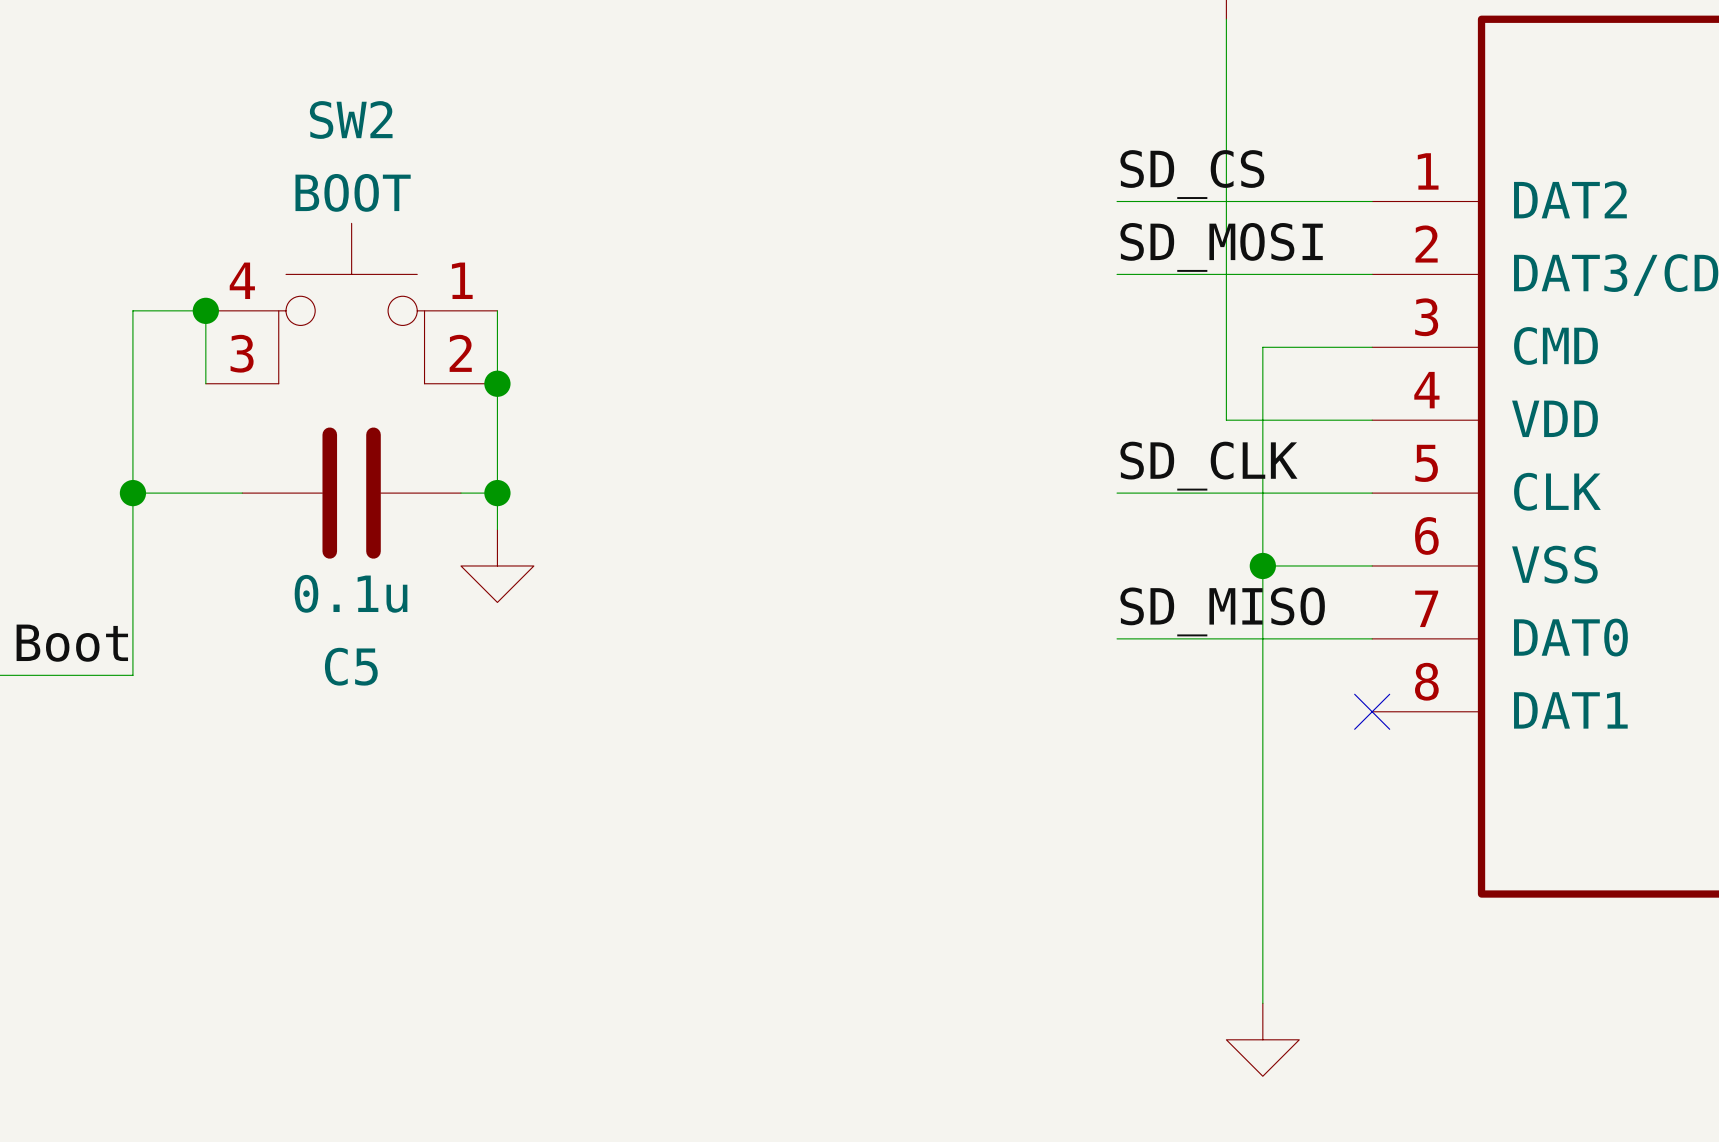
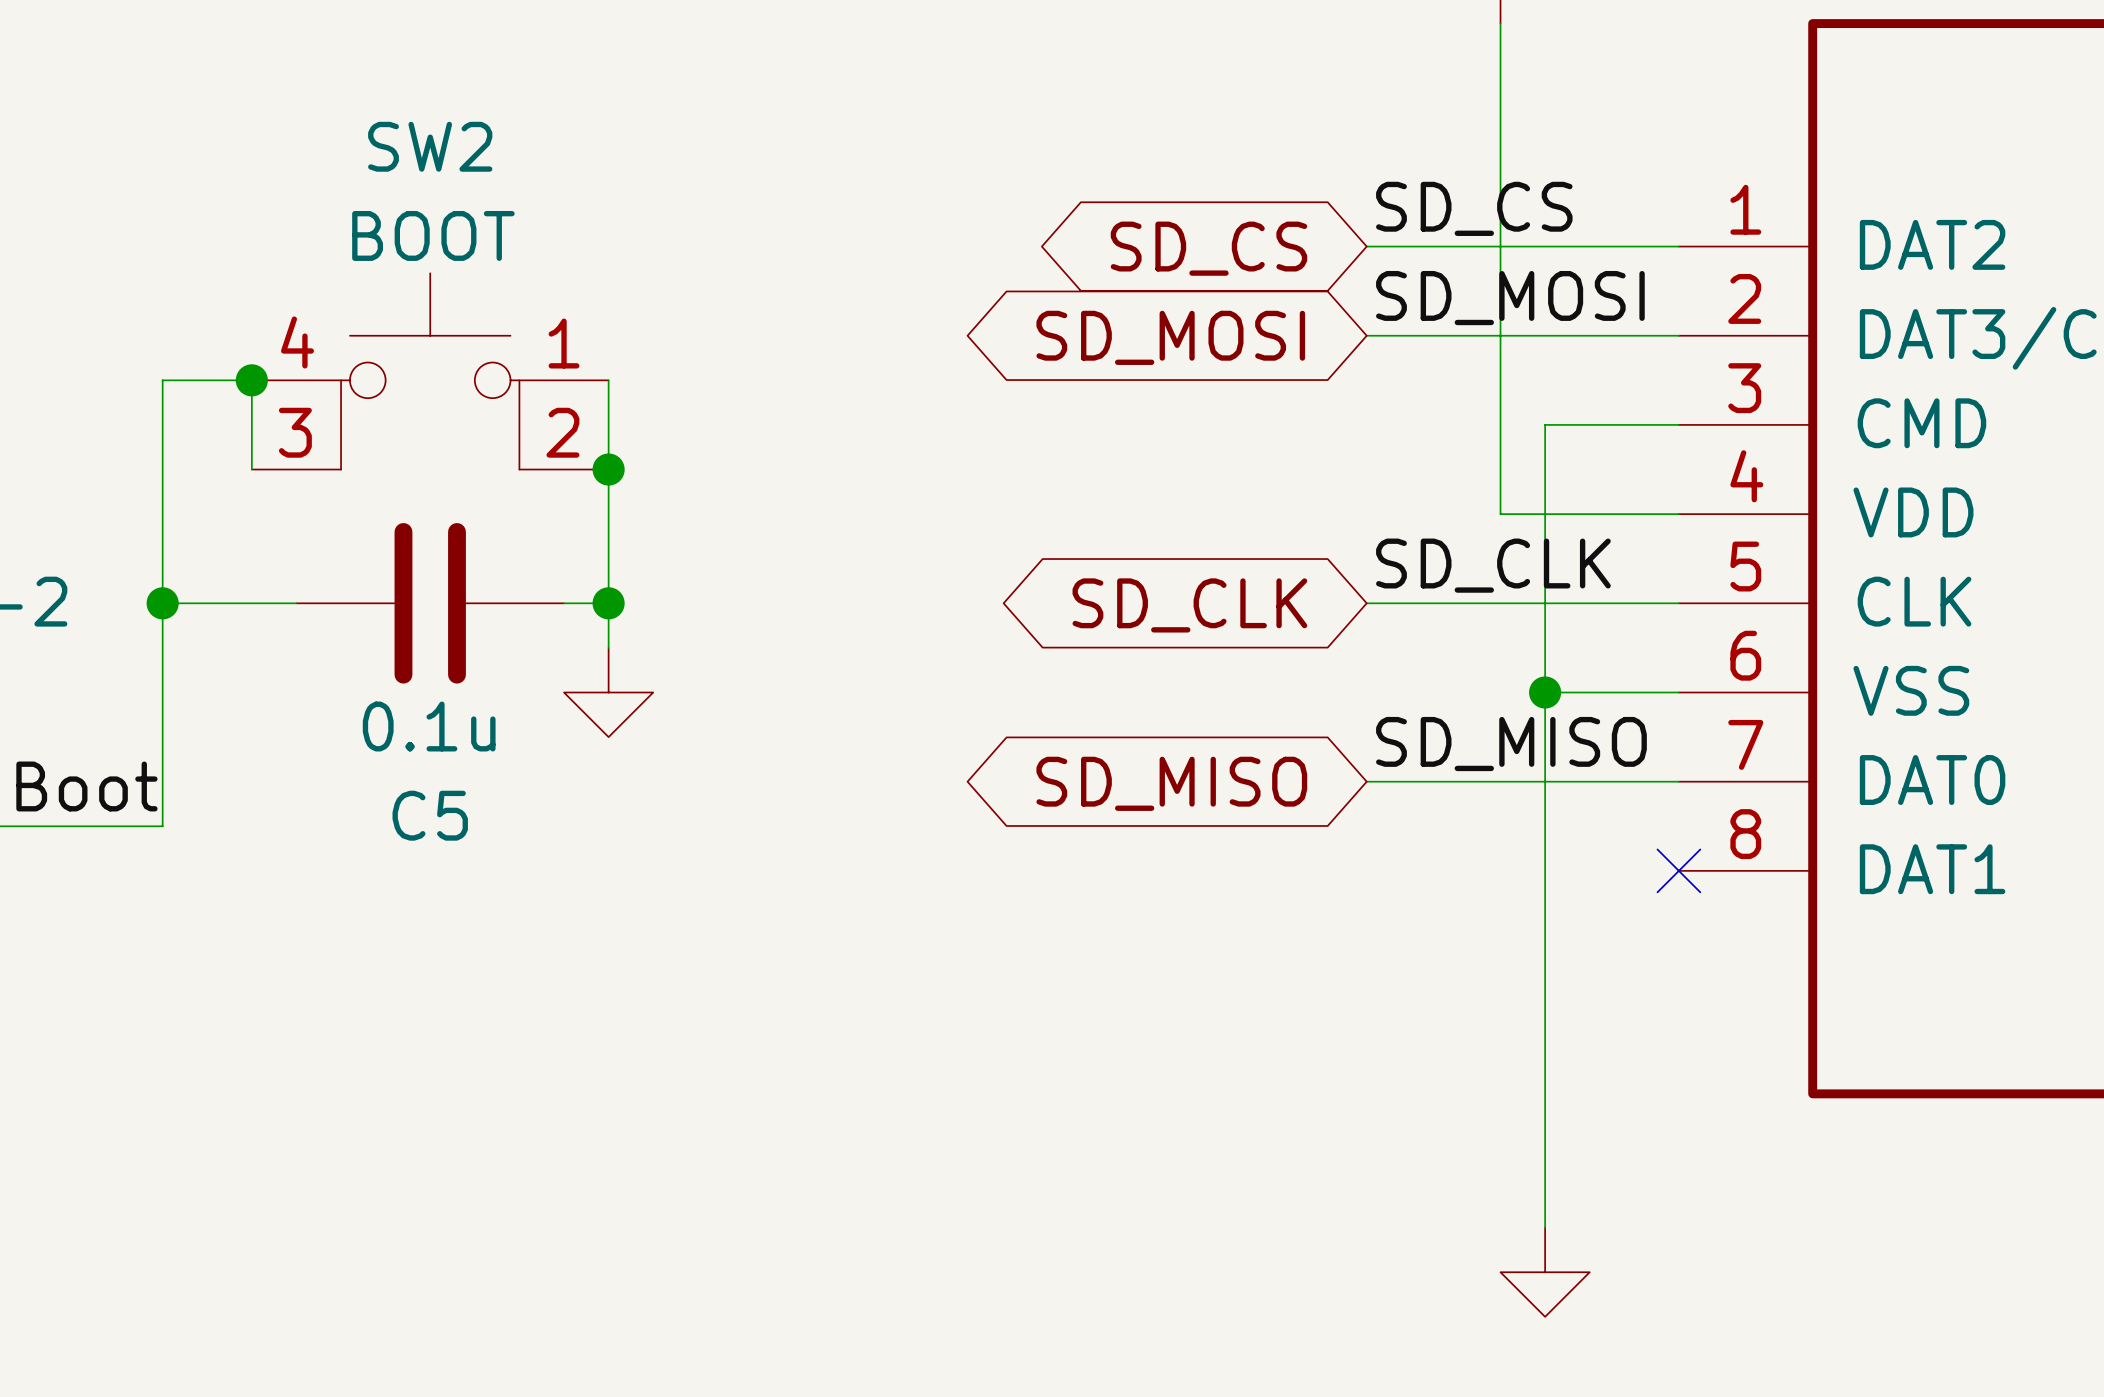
global label: none -> SD_CS (1208, 248)
global label: none -> SD_MOSI (1170, 337)
global label: none -> SD_CLK (1189, 605)
global label: none -> SD_MISO (1171, 783)

